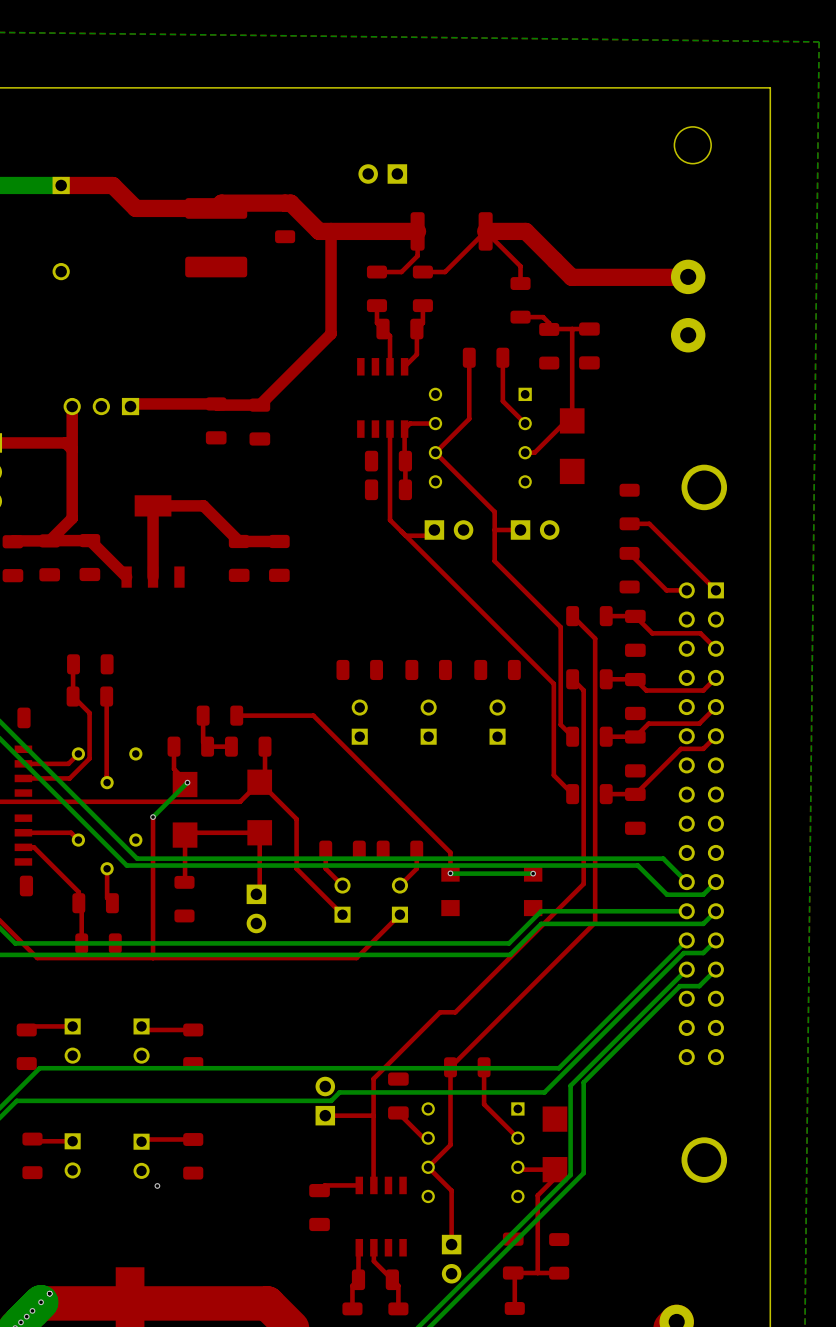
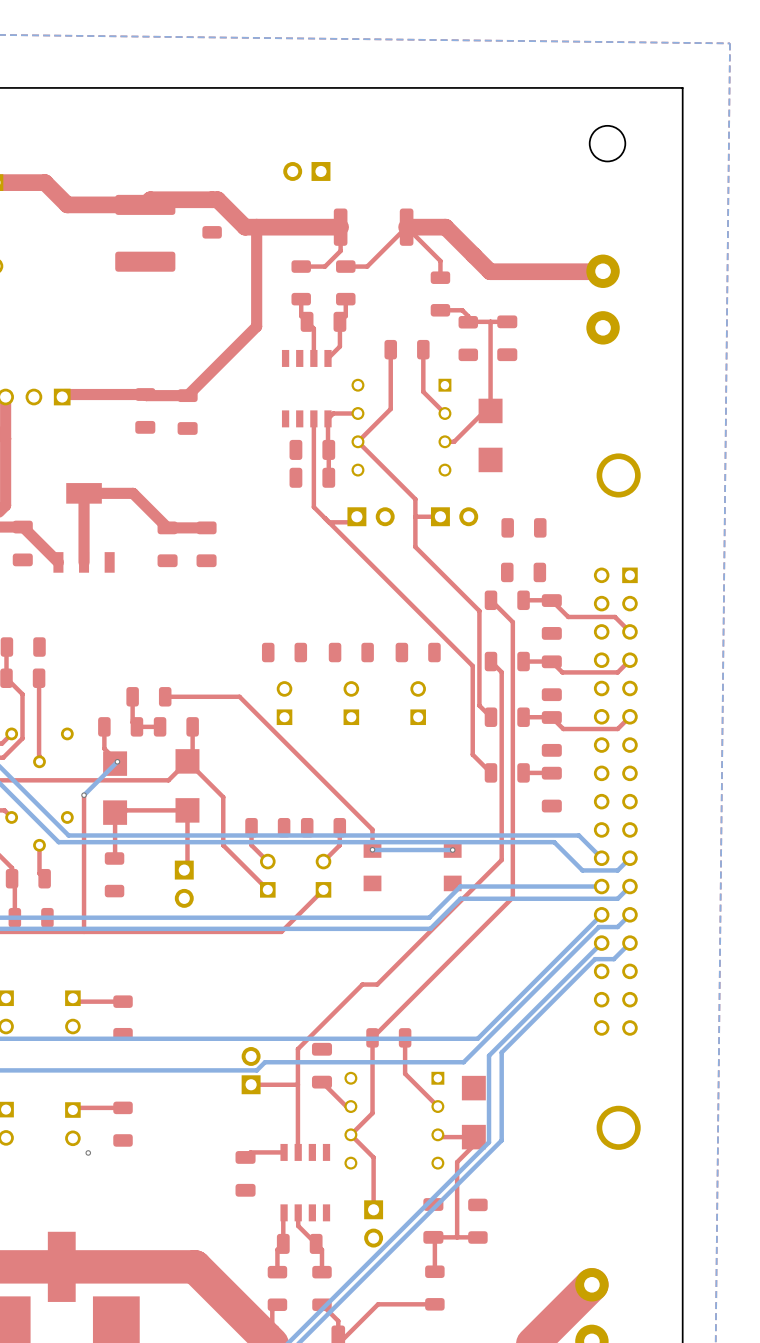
part: (629, 507) -> none
top track: (629, 523) (649, 523) (715, 590) -> none
part: none -> (523, 527)
top track: (629, 553) (666, 590) (686, 590) -> none
part: (629, 570) -> none
part: none -> (523, 572)
top track: (715, 707) (699, 723) (648, 723) (635, 736) -> (596, 729) (563, 729) (551, 717)
top track: (680, 748) (635, 794) -> none

